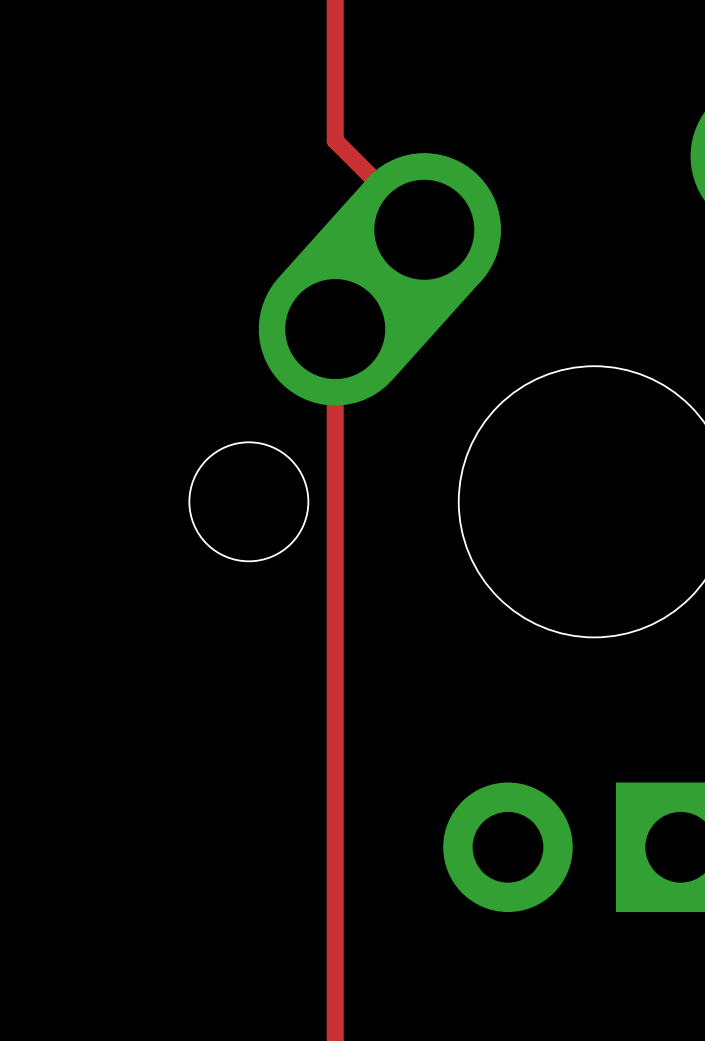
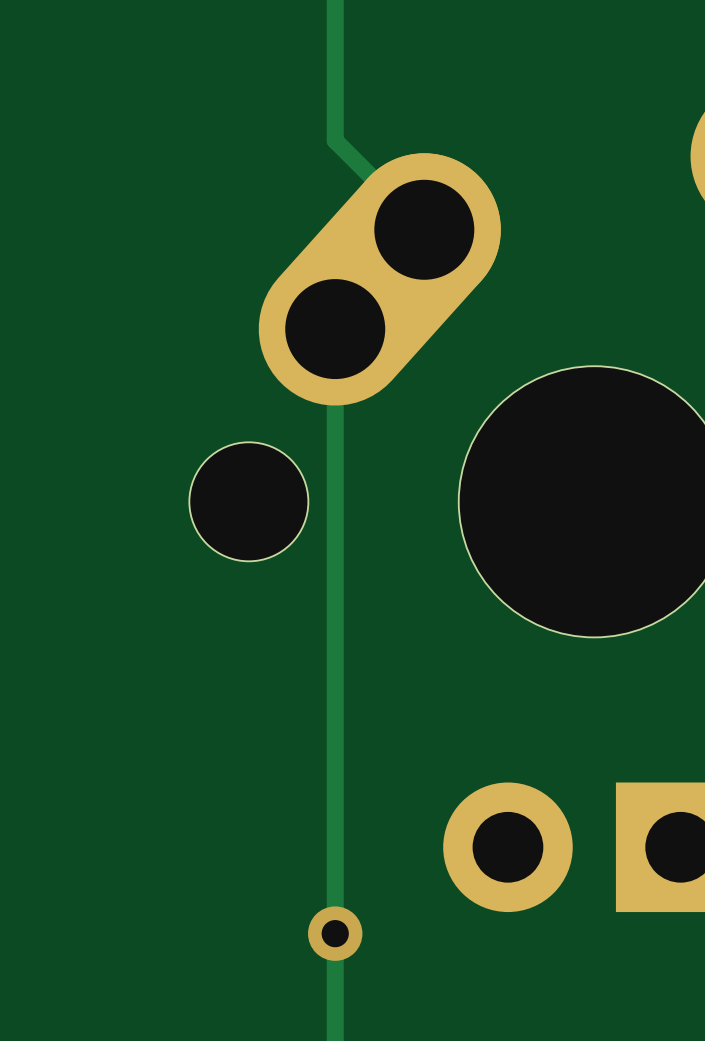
via: none -> (335, 933)

